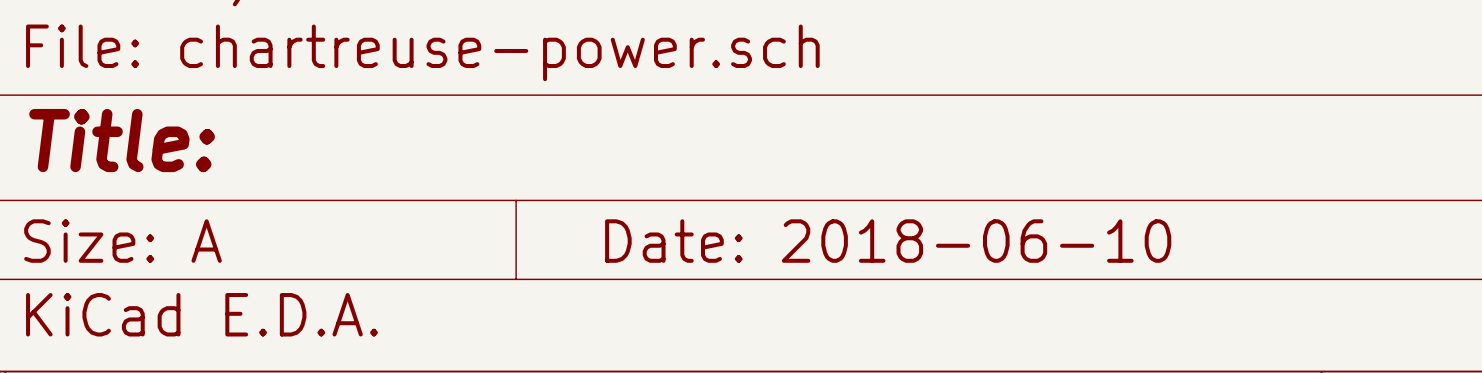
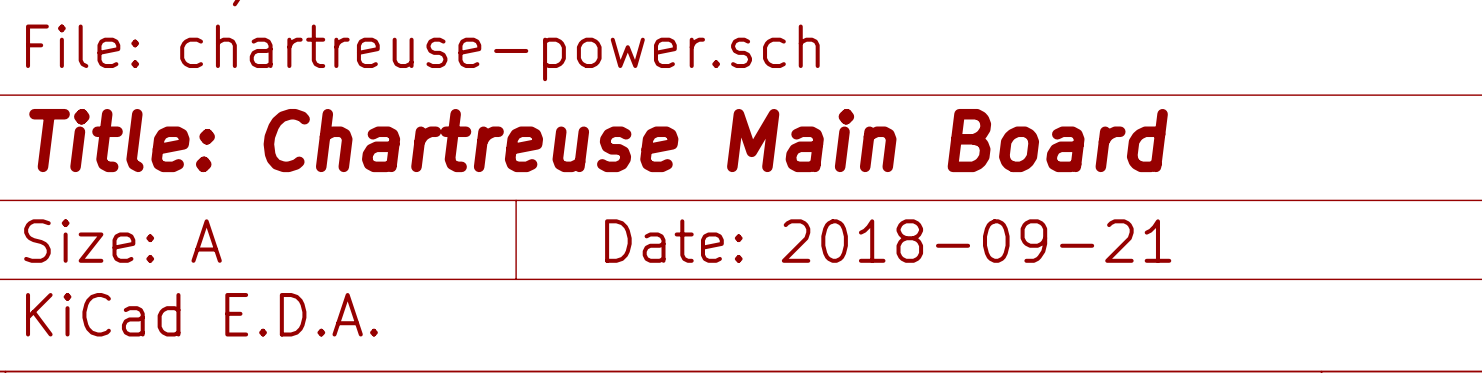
title block: Title: (122, 140) -> Title: Chartreuse Main Board (598, 140)
title block: Date: 2018-06-10 (888, 241) -> Date: 2018-09-21 (888, 241)

